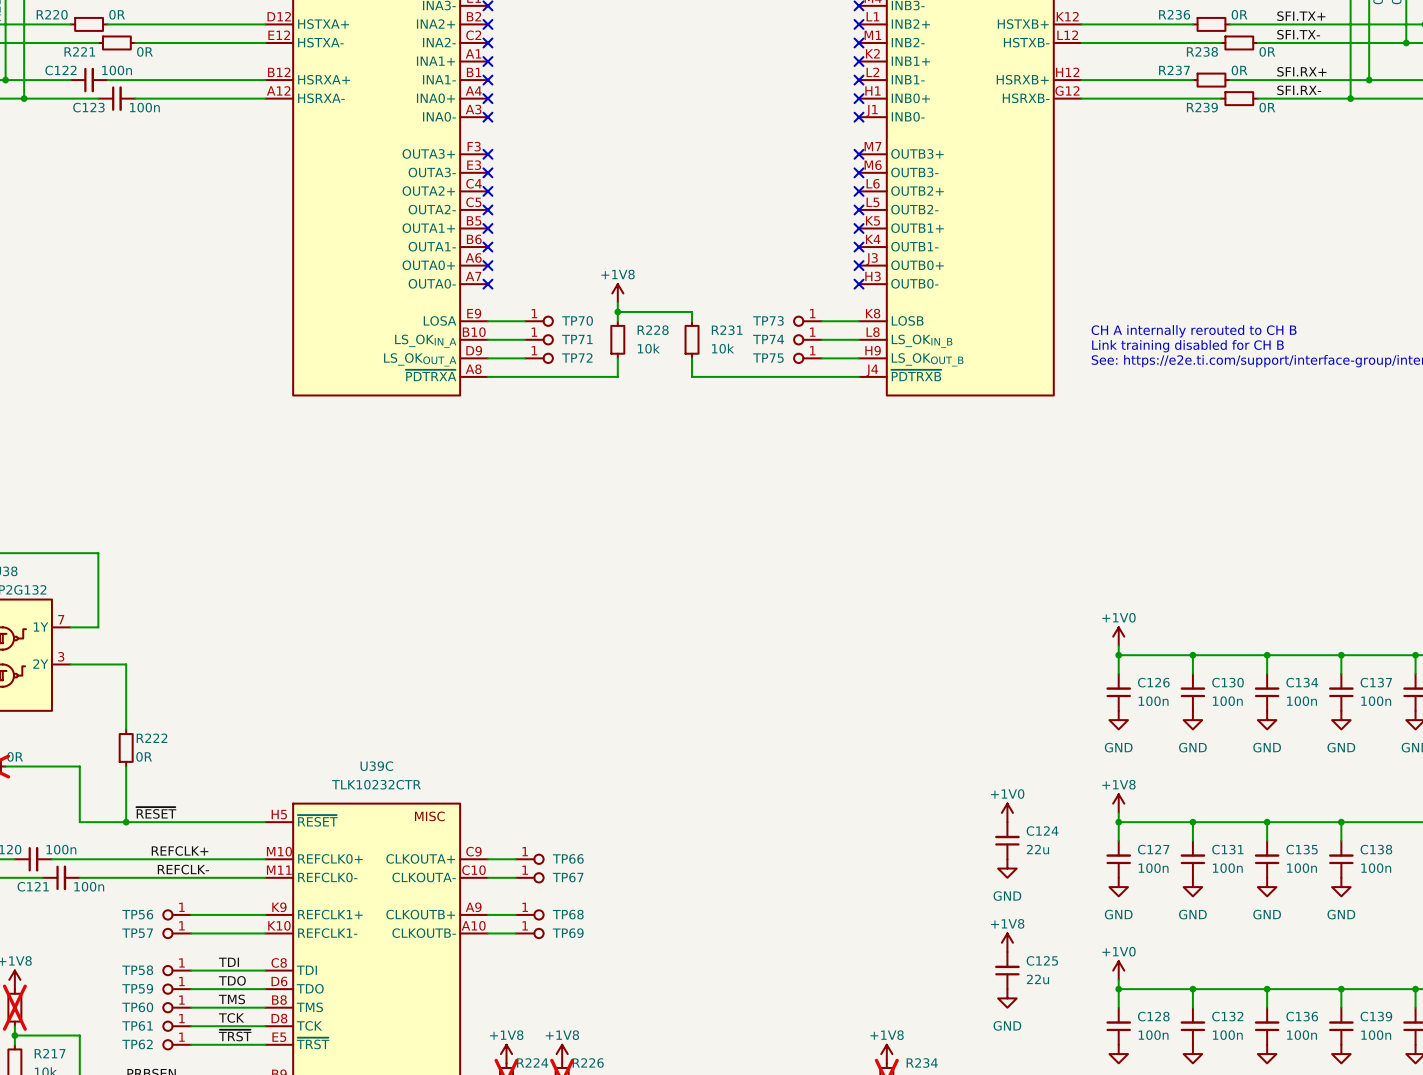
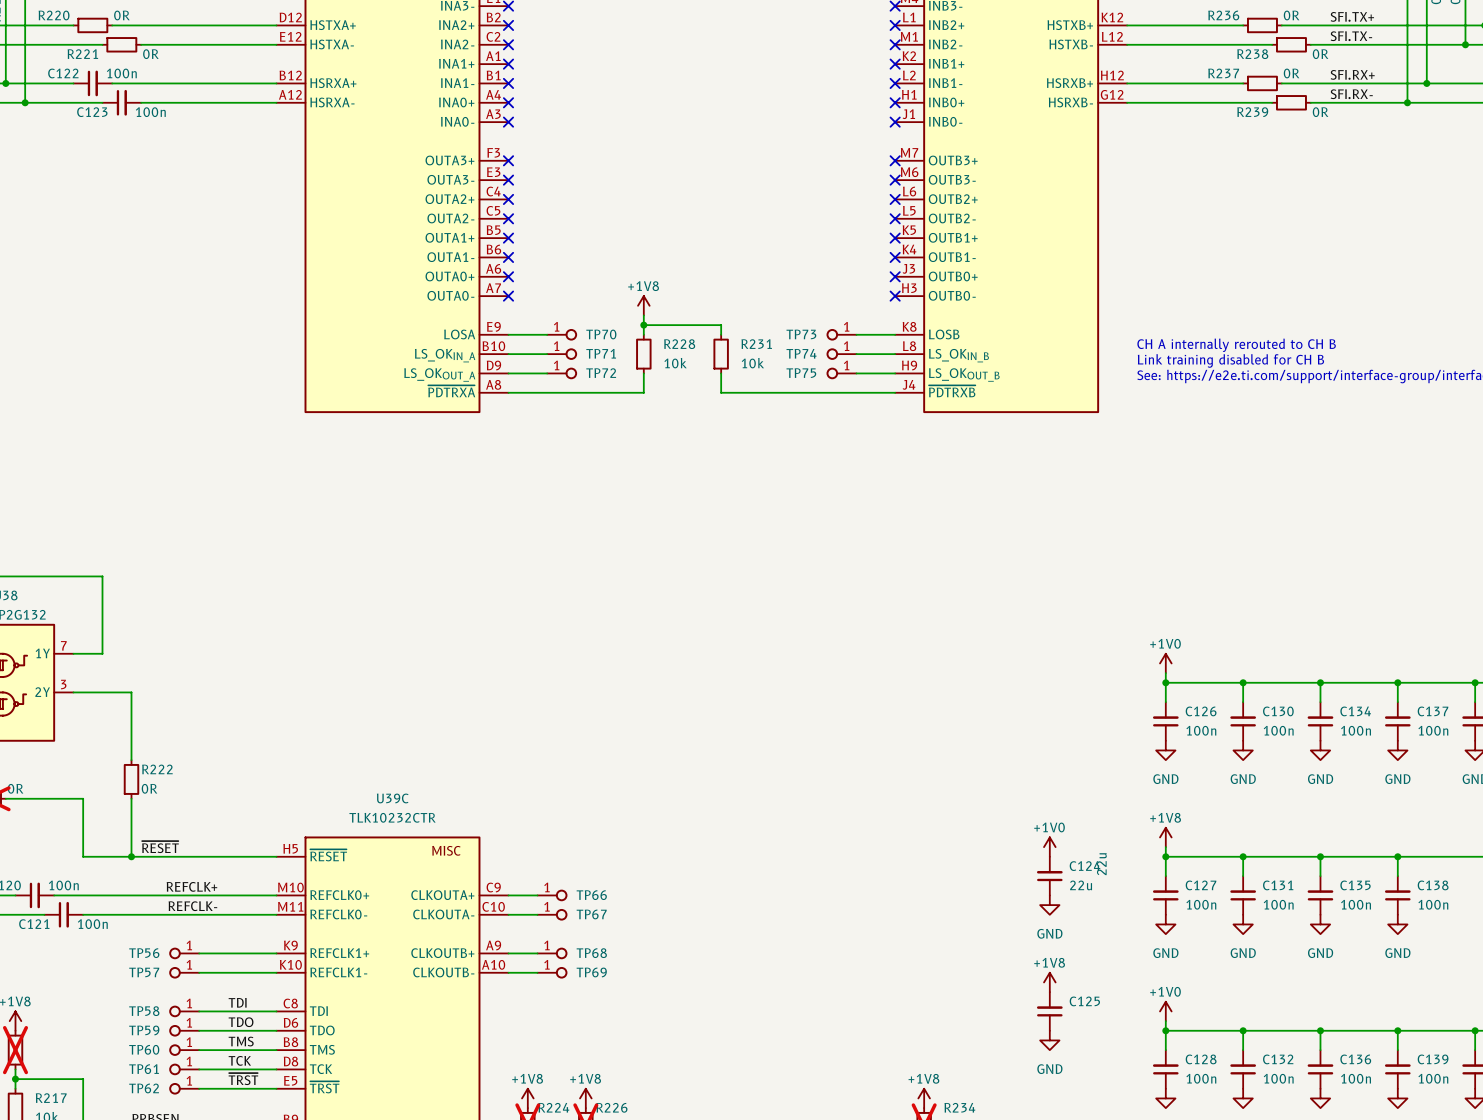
C125 text rotation: 0° (1037, 979) -> 90° counterclockwise (1101, 864)
C125 text position: 22u (1037, 979) -> 22u (1101, 864)

